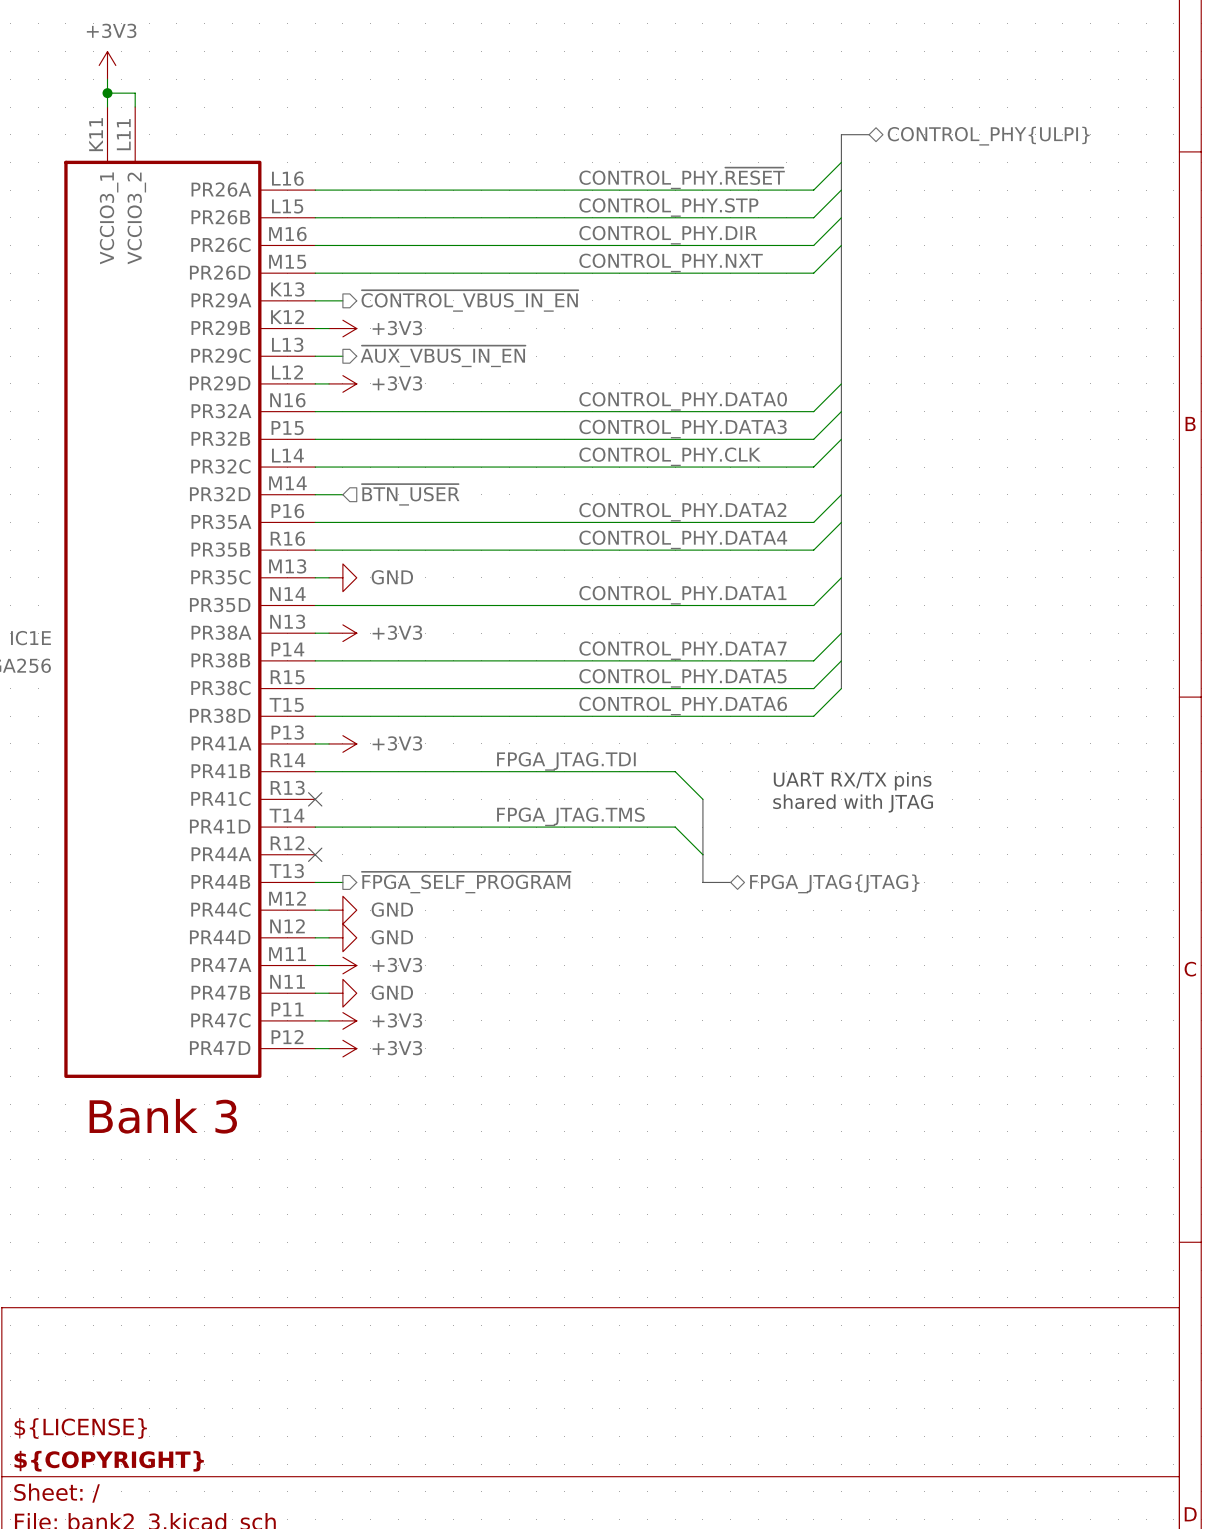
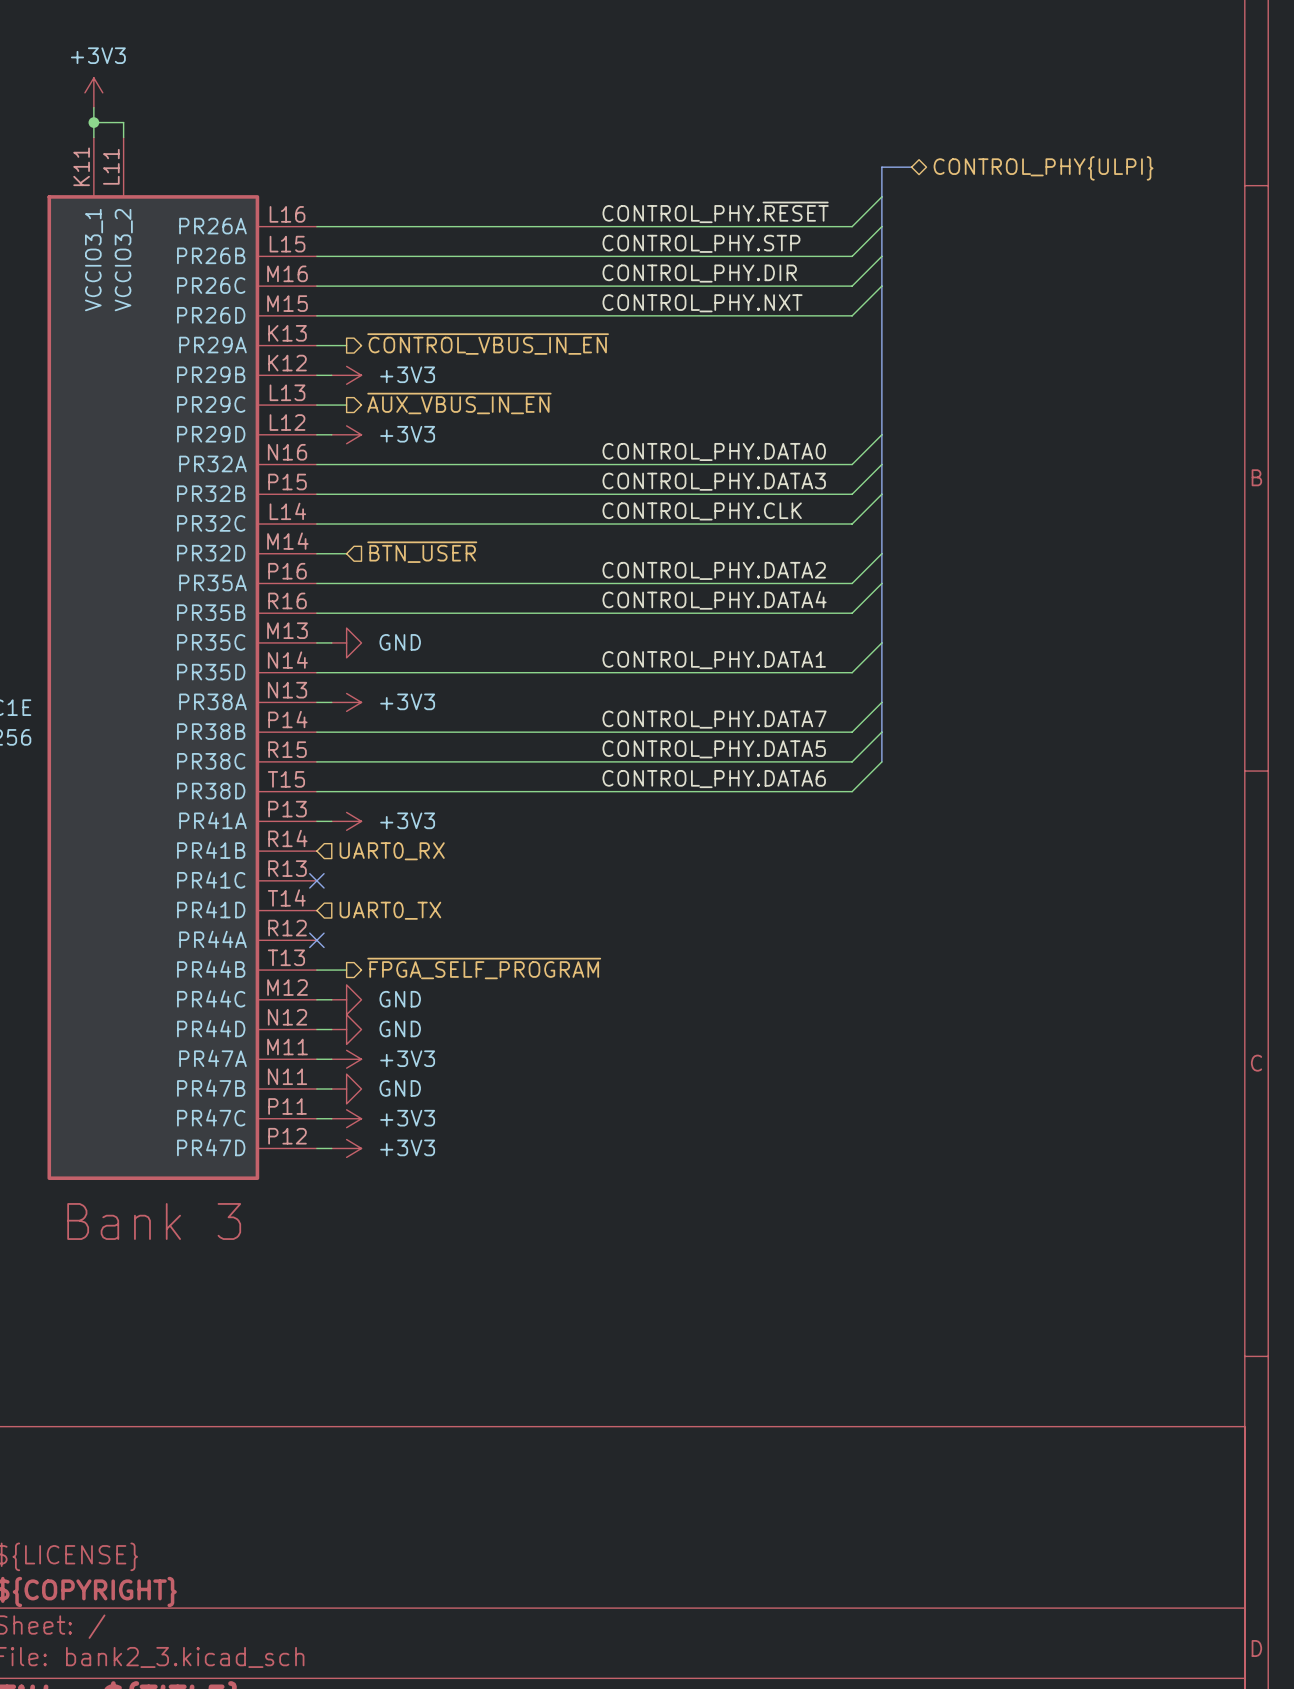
label: FPGA_JTAG.TDI (566, 761) -> none
wire: (315, 771) (675, 771) (702, 799) -> none
hierarchical label: none -> UART0_RX (392, 851)
text: UART RX/TX pins (852, 781) -> none
bus: (702, 799) (702, 882) (730, 882) -> none
text: shared with JTAG (853, 803) -> none
label: FPGA_JTAG.TMS (570, 816) -> none
wire: (315, 827) (675, 827) (702, 854) -> none
hierarchical label: none -> UART0_TX (390, 910)
hierarchical label: FPGA_JTAG{JTAG} (834, 883) -> none

